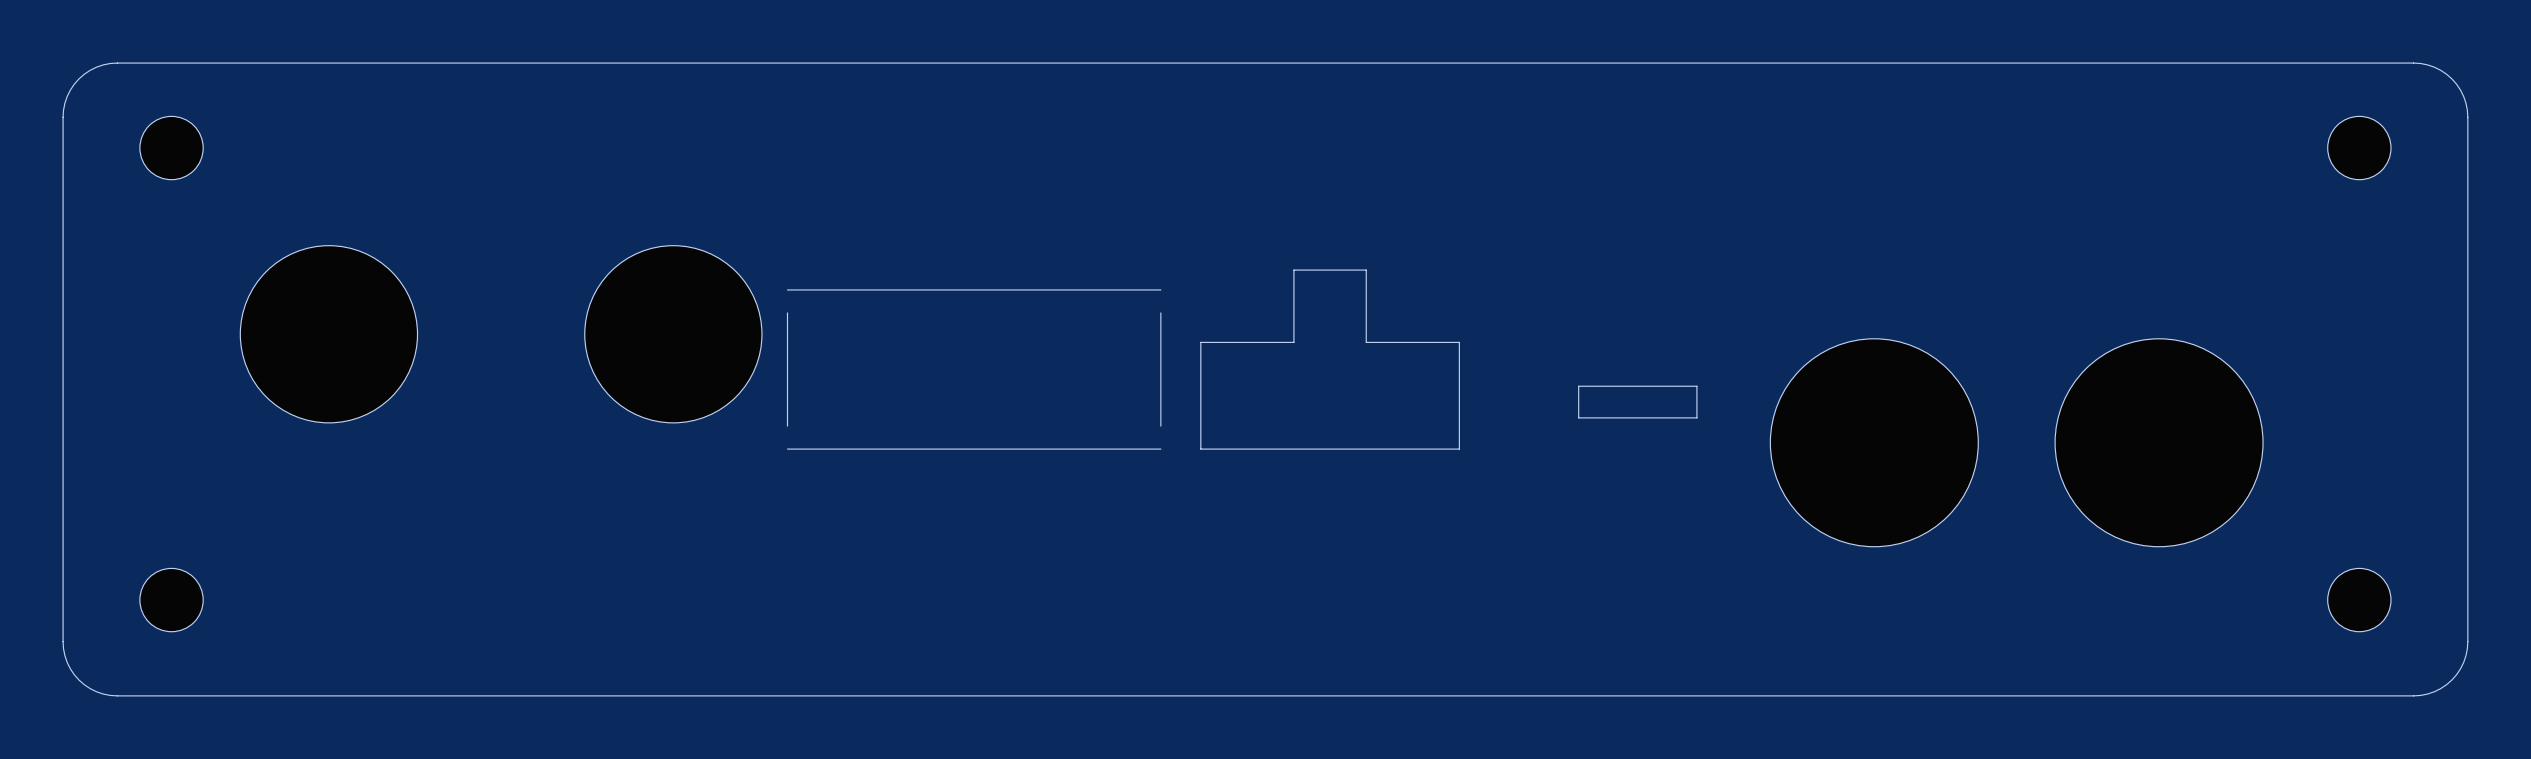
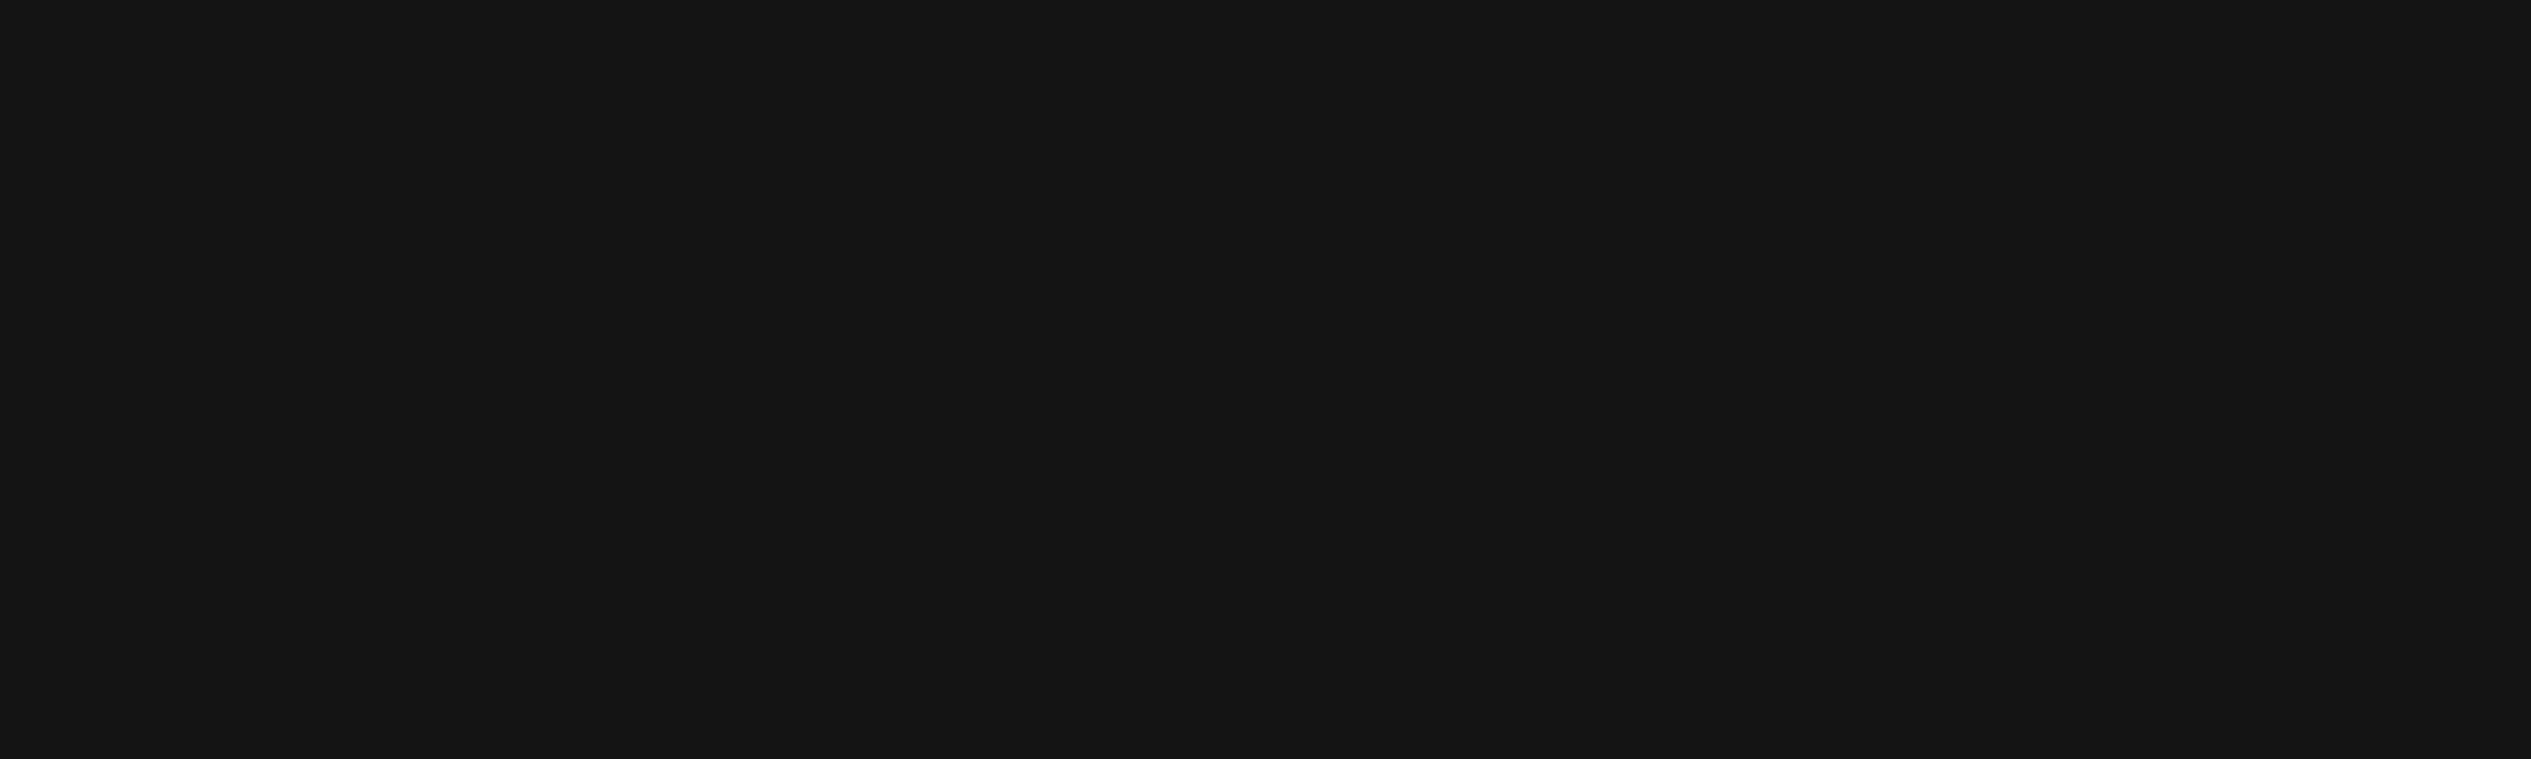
board edge: (2413, 63) (117, 63) (103, 64) (84, 74) (74, 84) (64, 103) (63, 117) (63, 641) (64, 655) (74, 674) (84, 684) (103, 694) (117, 695) (2413, 695) (2427, 694) (2446, 684) (2456, 674) (2463, 662) (2467, 648) (2467, 117) (2463, 96) (2451, 78) (2434, 67) (2413, 63) -> none
hole: (171, 148) -> none
hole: (2359, 148) -> none
board edge: (1366, 270) (1366, 342) (1459, 342) (1459, 449) (1200, 449) (1200, 342) (1293, 342) (1293, 270) (1366, 270) -> none
board edge: (1160, 289) (787, 289) -> none
board edge: (787, 312) (787, 426) -> none
board edge: (1160, 312) (1160, 426) -> none
hole: (328, 334) -> none
hole: (673, 334) -> none
board edge: (1696, 386) (1696, 417) (1578, 417) (1578, 386) (1696, 386) -> none
hole: (1874, 442) -> none
hole: (2159, 442) -> none
board edge: (1160, 449) (787, 449) -> none
hole: (171, 600) -> none
hole: (2359, 600) -> none

